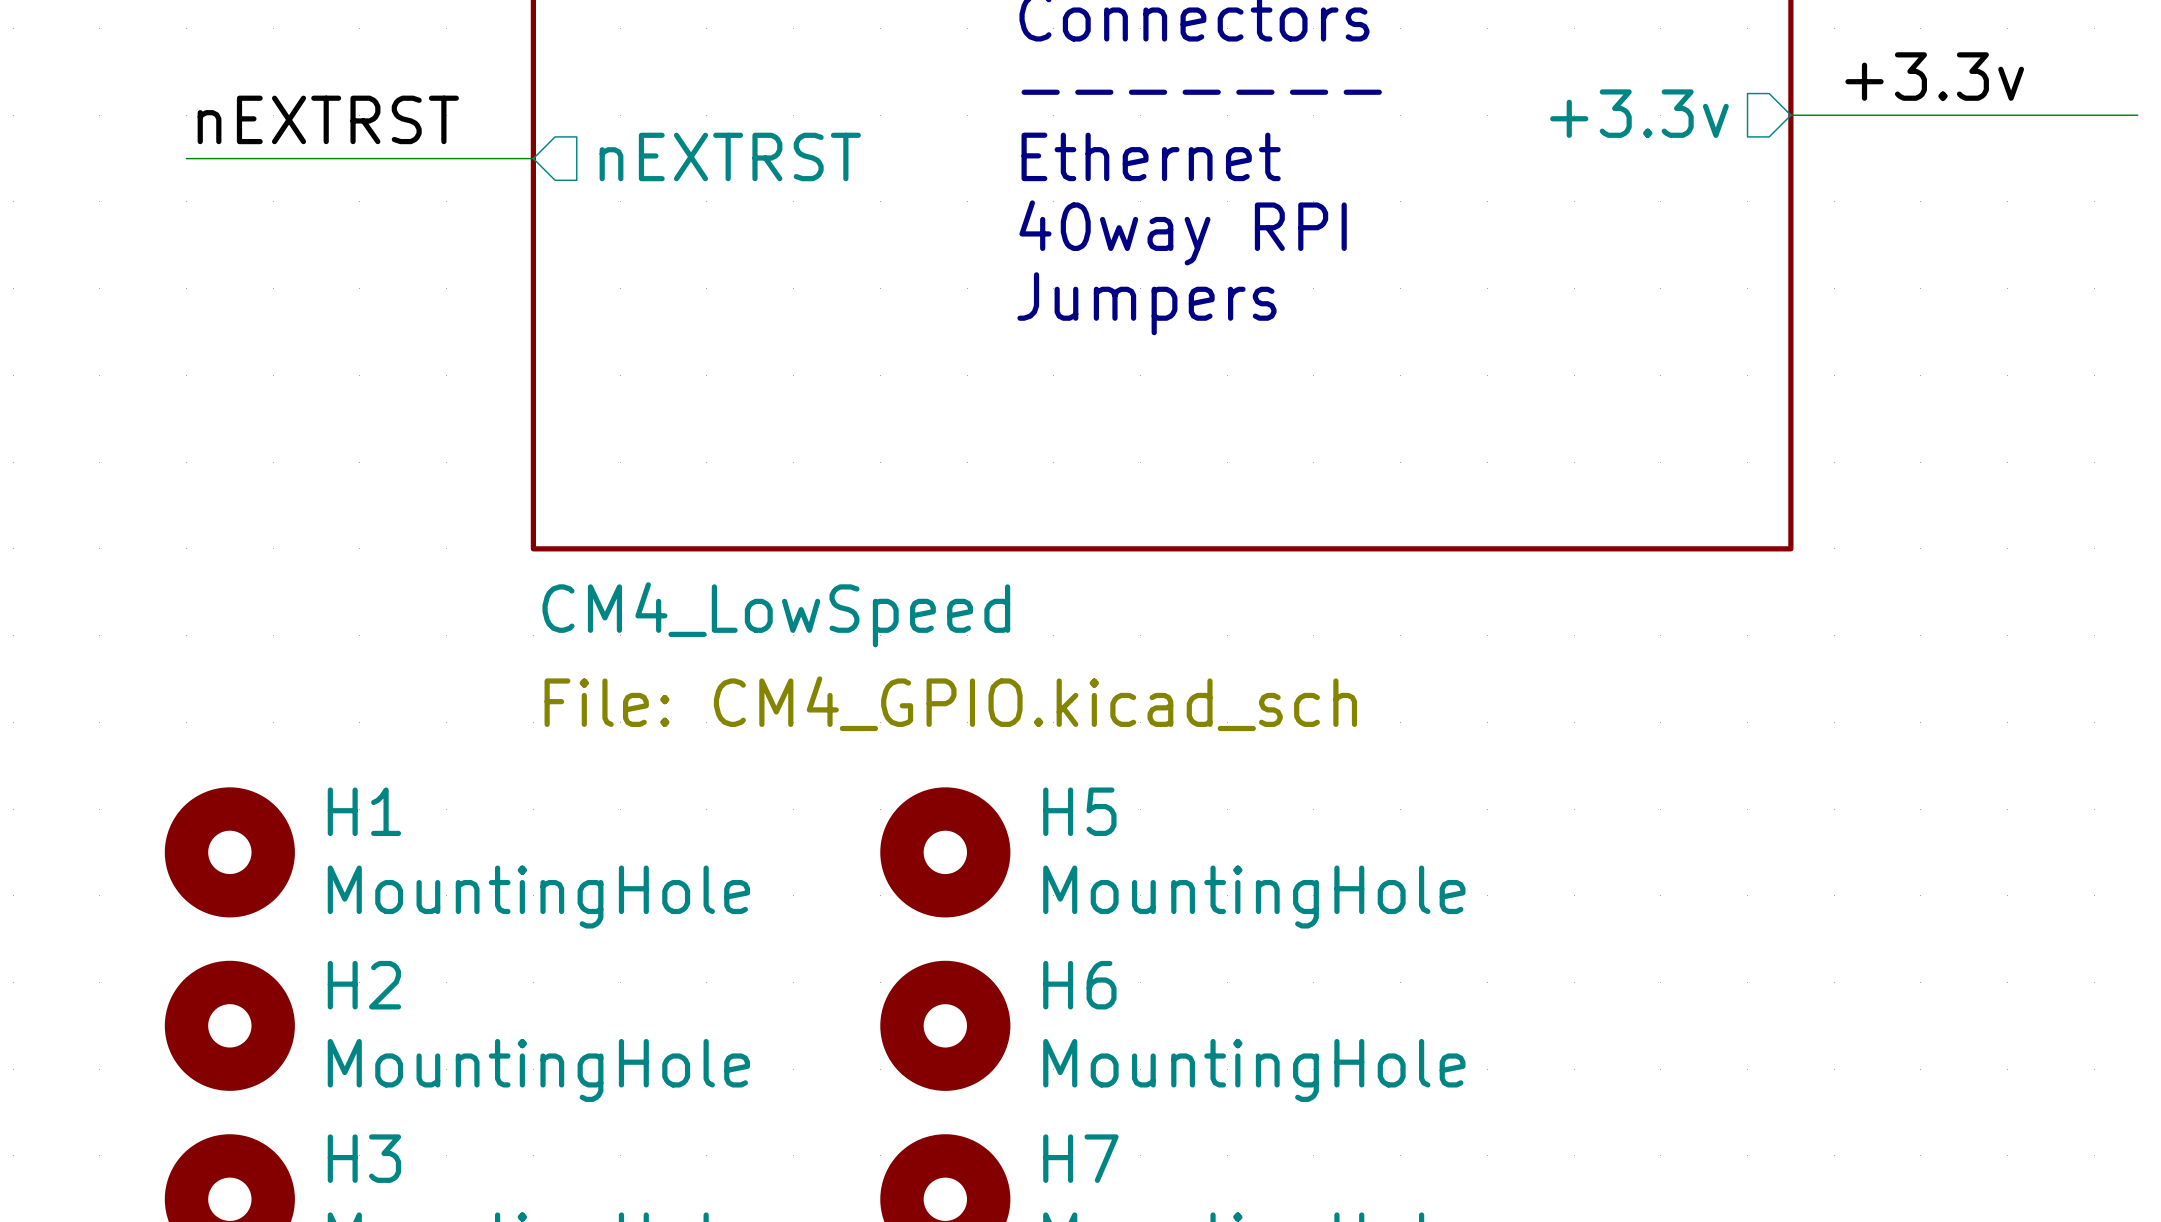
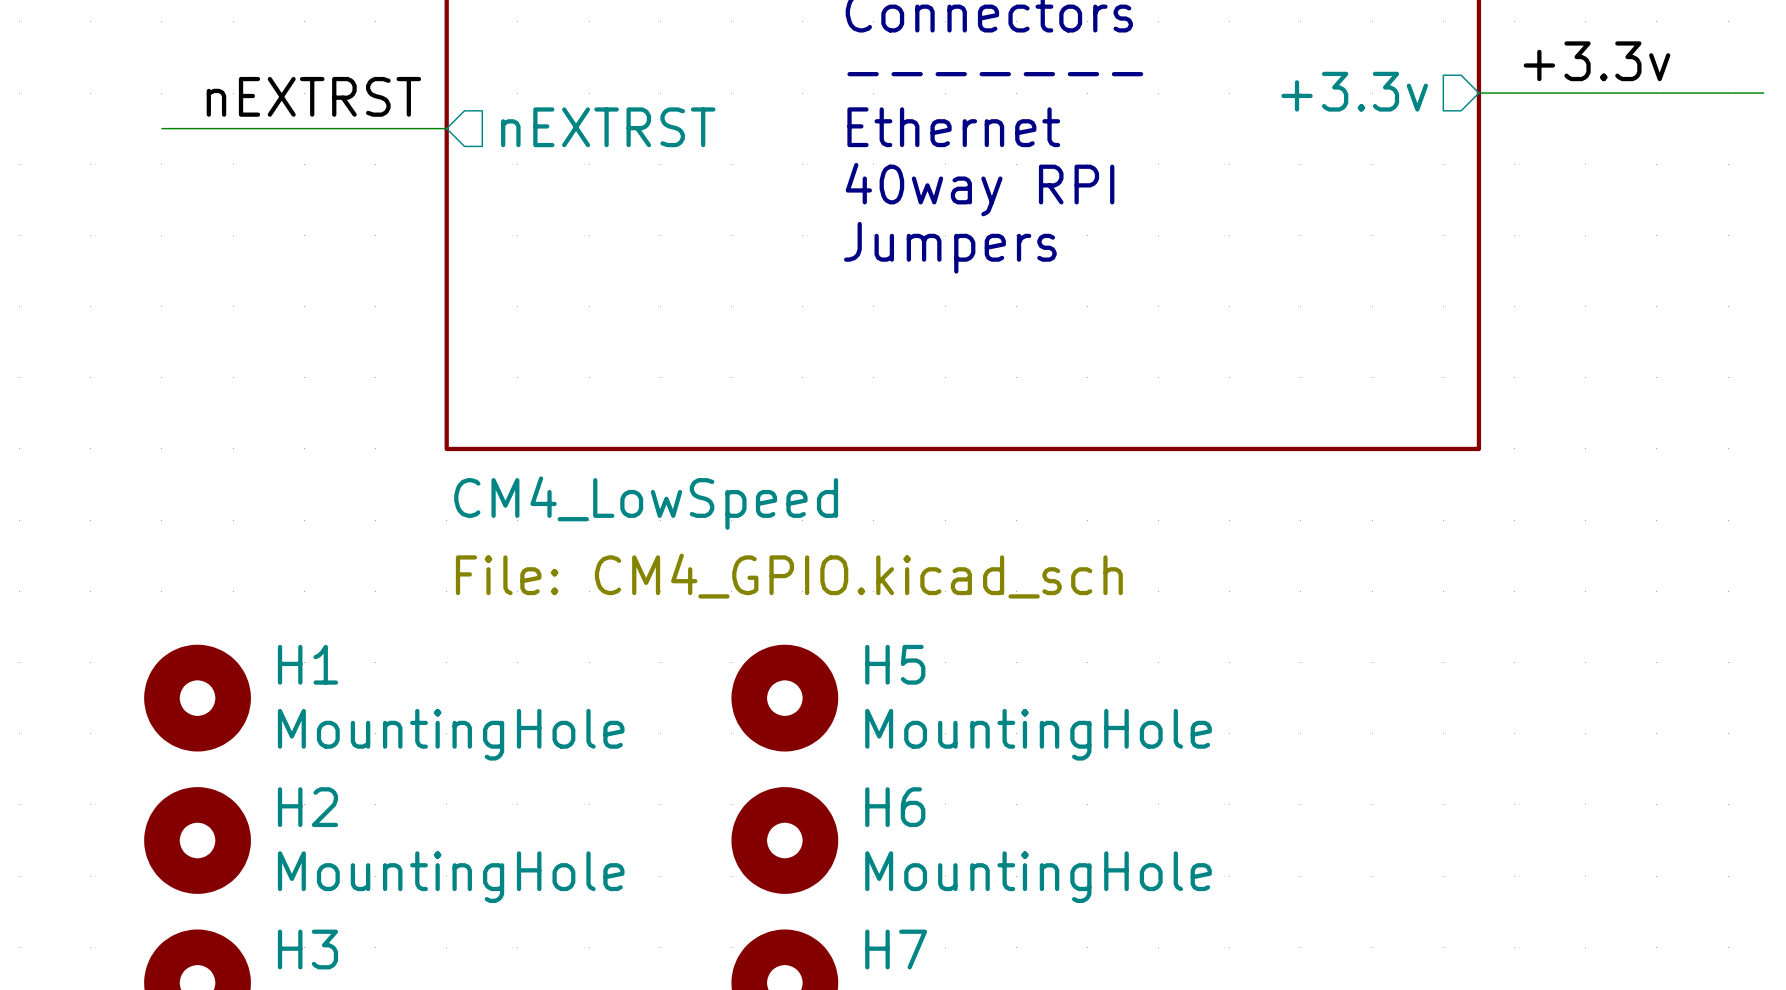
label position: nEXTRST (328, 119) -> nEXTRST (313, 96)

